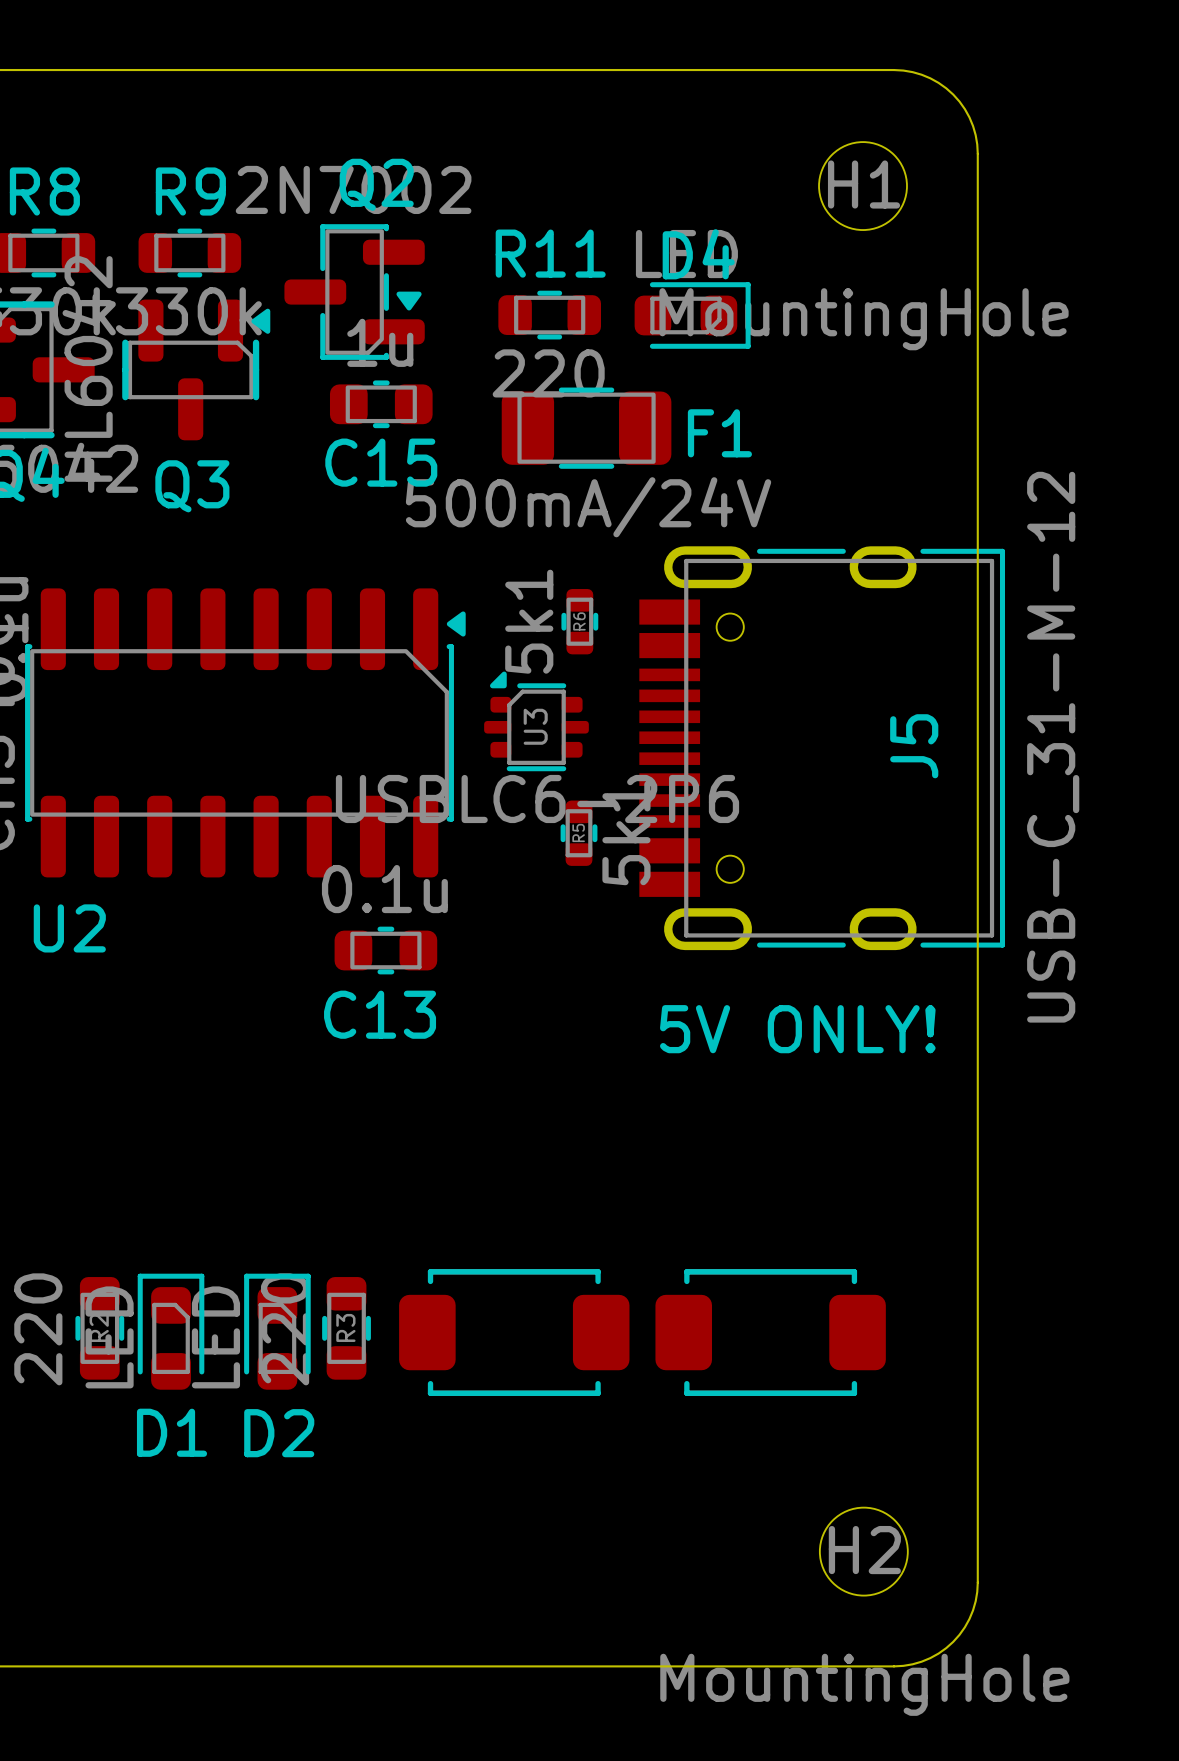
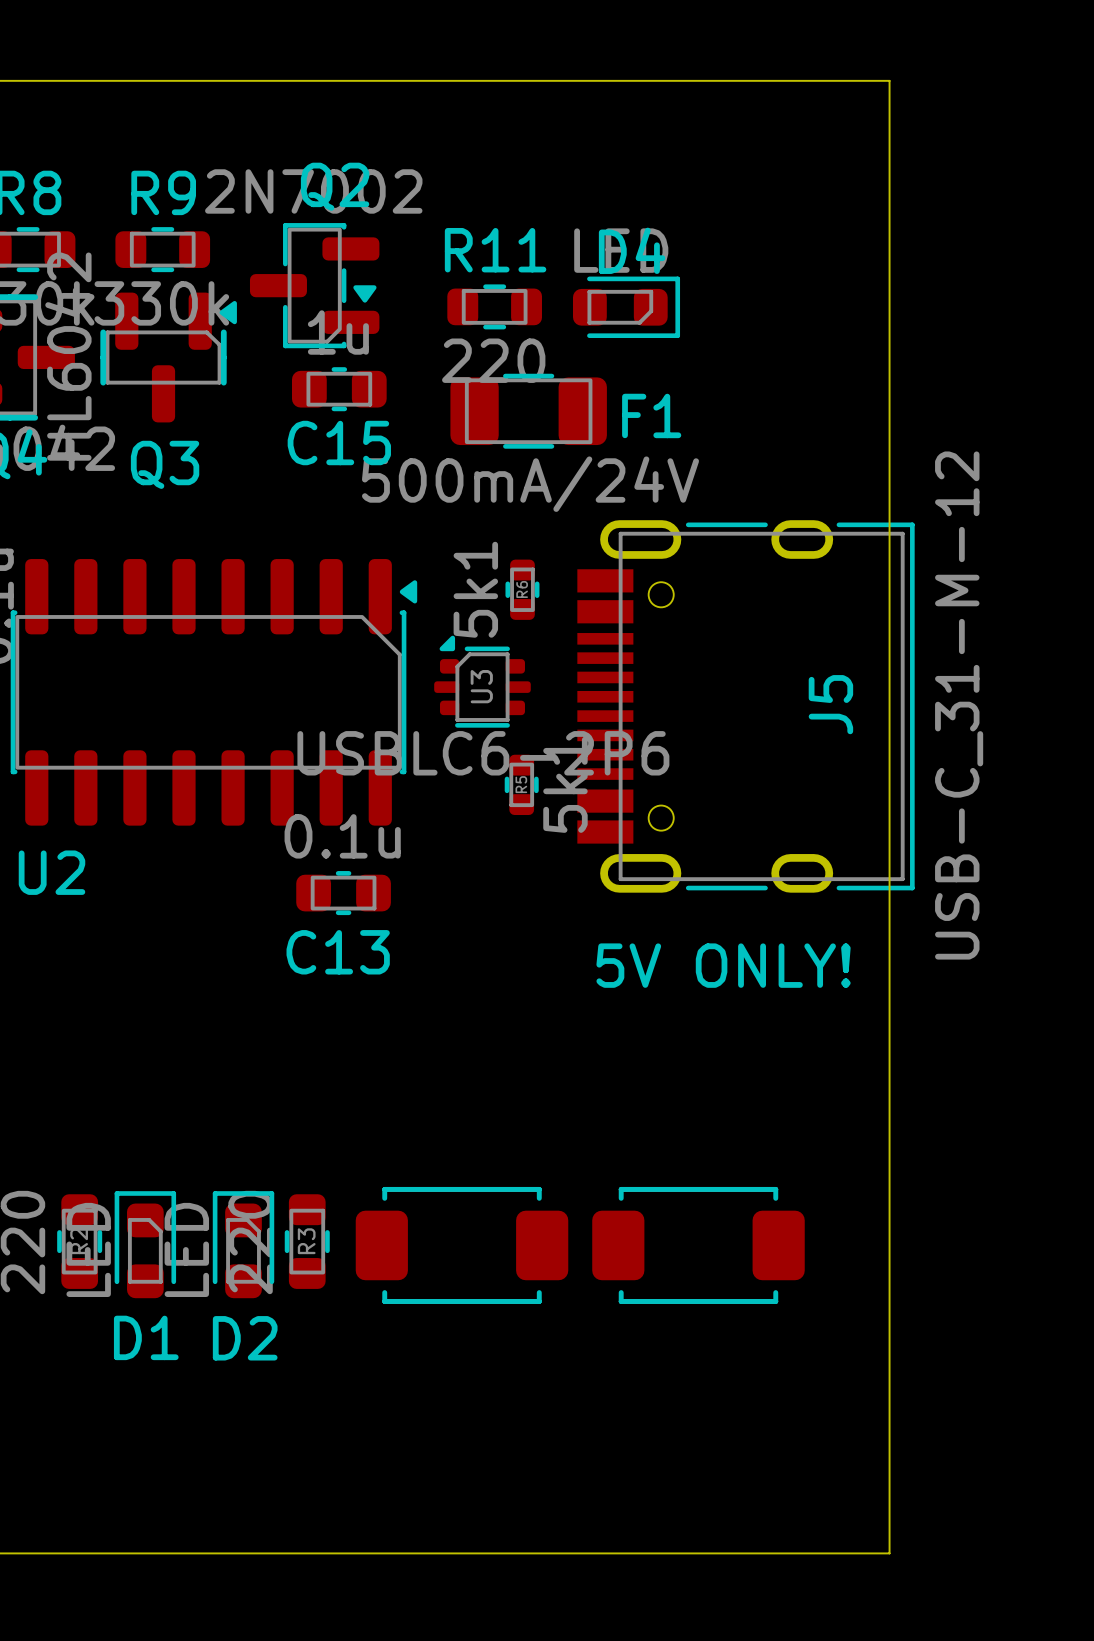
board edge: (894, 70) (921, 74) (938, 82) (953, 94) (964, 109) (973, 126) (977, 153) -> (812, 80) (889, 80) (889, 158)
H1: MountingHole (863, 186) -> none
H2: MountingHole (863, 1551) -> none
board edge: (977, 1582) (973, 1610) (964, 1627) (953, 1641) (938, 1653) (921, 1661) (894, 1666) -> (889, 1476) (889, 1553) (812, 1553)

